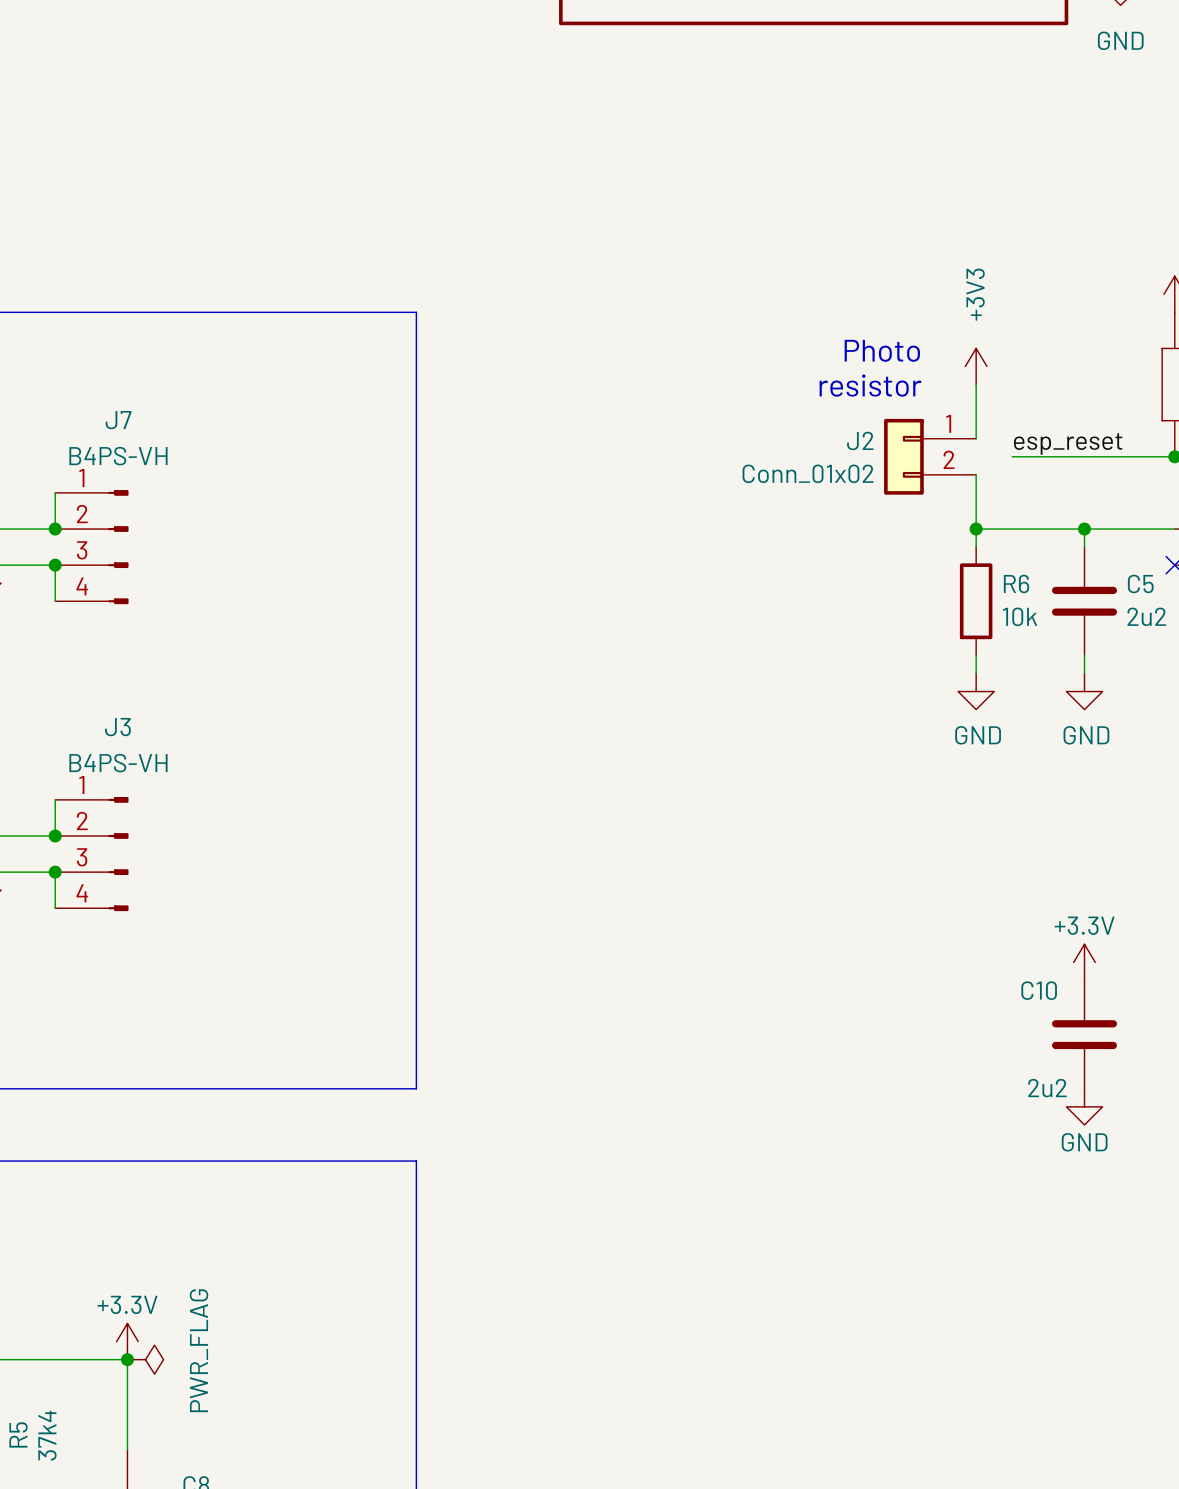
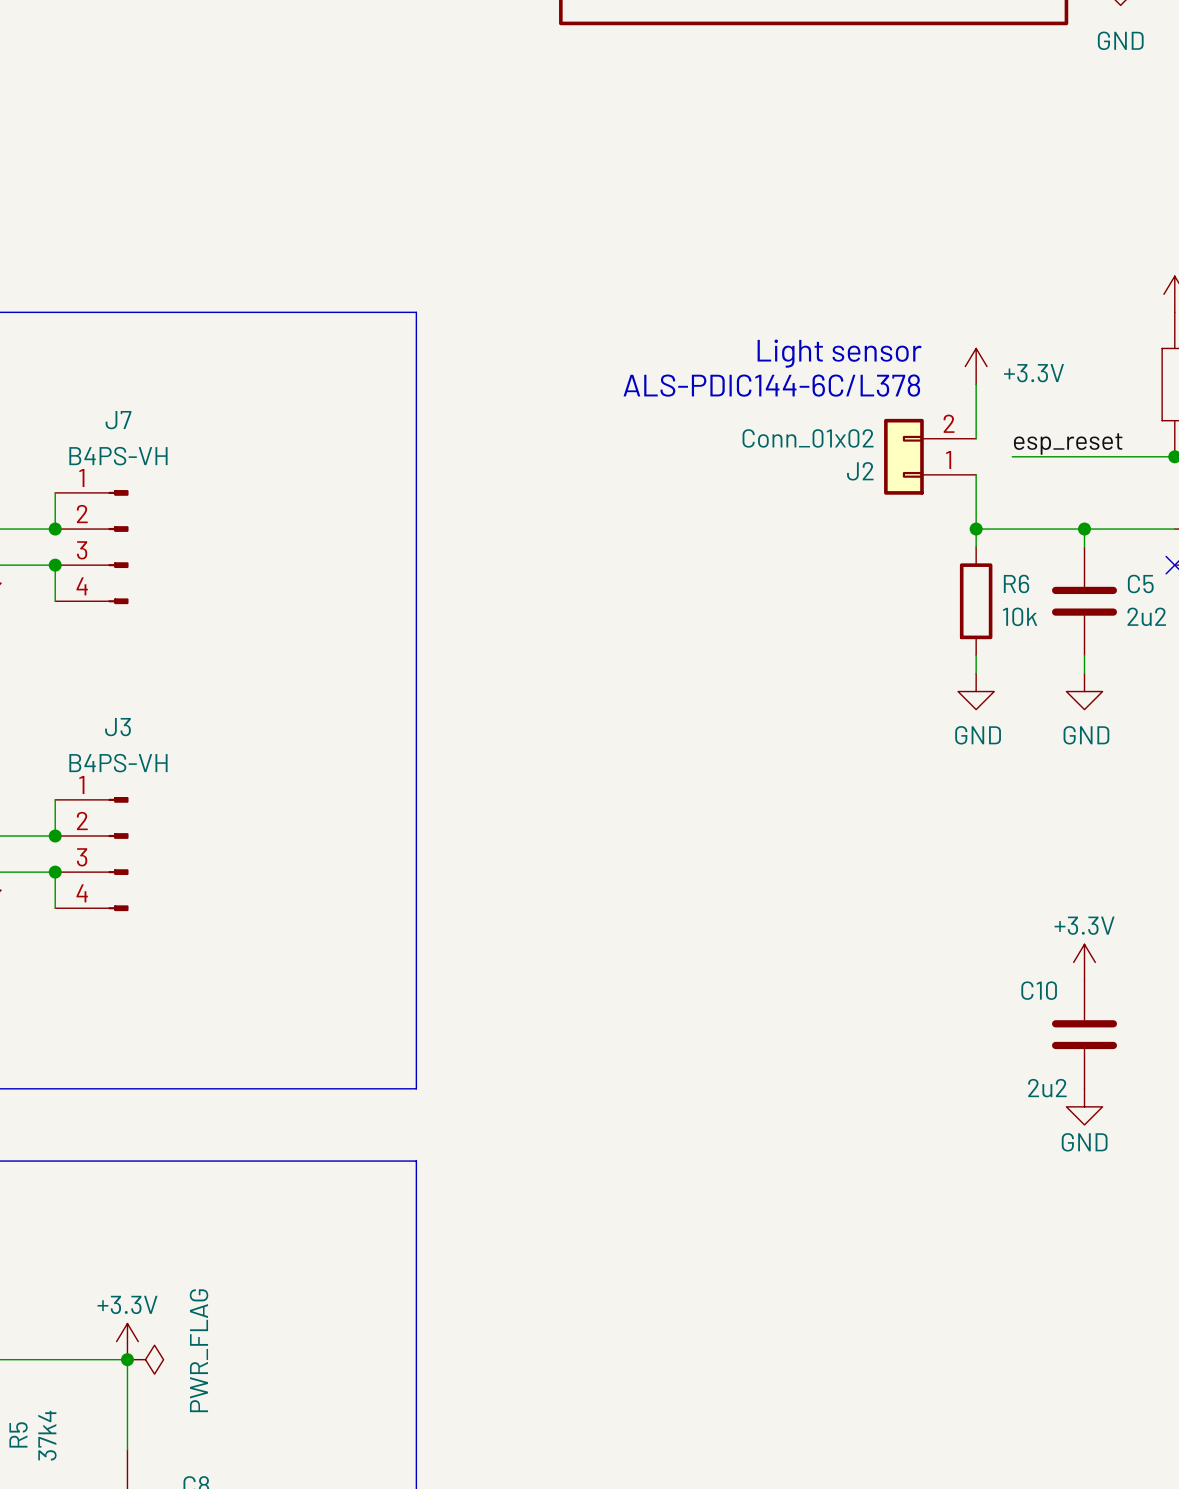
text: Photo (882, 350) -> Light sensor (839, 353)
power symbol: +3V3 (976, 366) -> +3.3V (976, 366)
text: resistor (870, 385) -> ALS-PDIC144-6C/L378 (771, 385)
J2 flip: as is (903, 456) -> up-down (903, 456)

